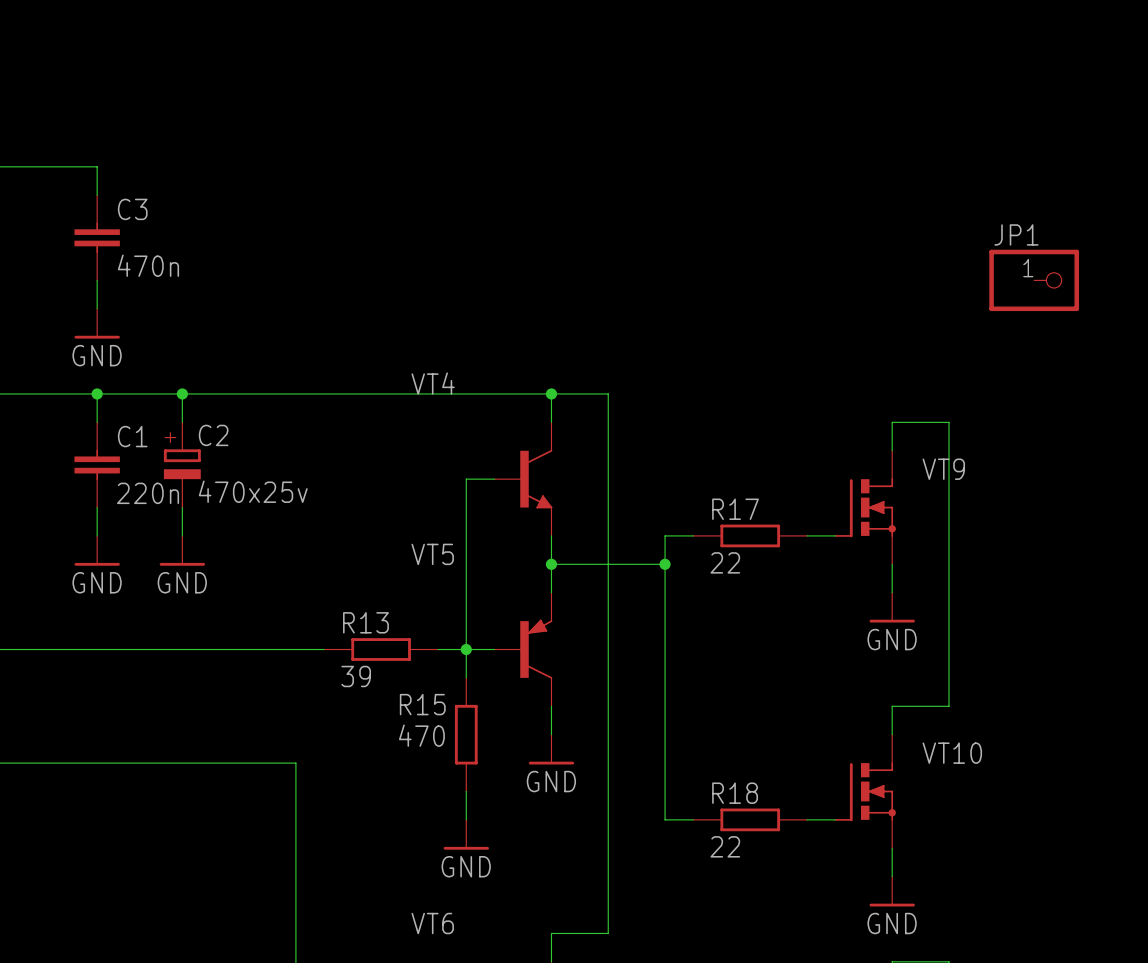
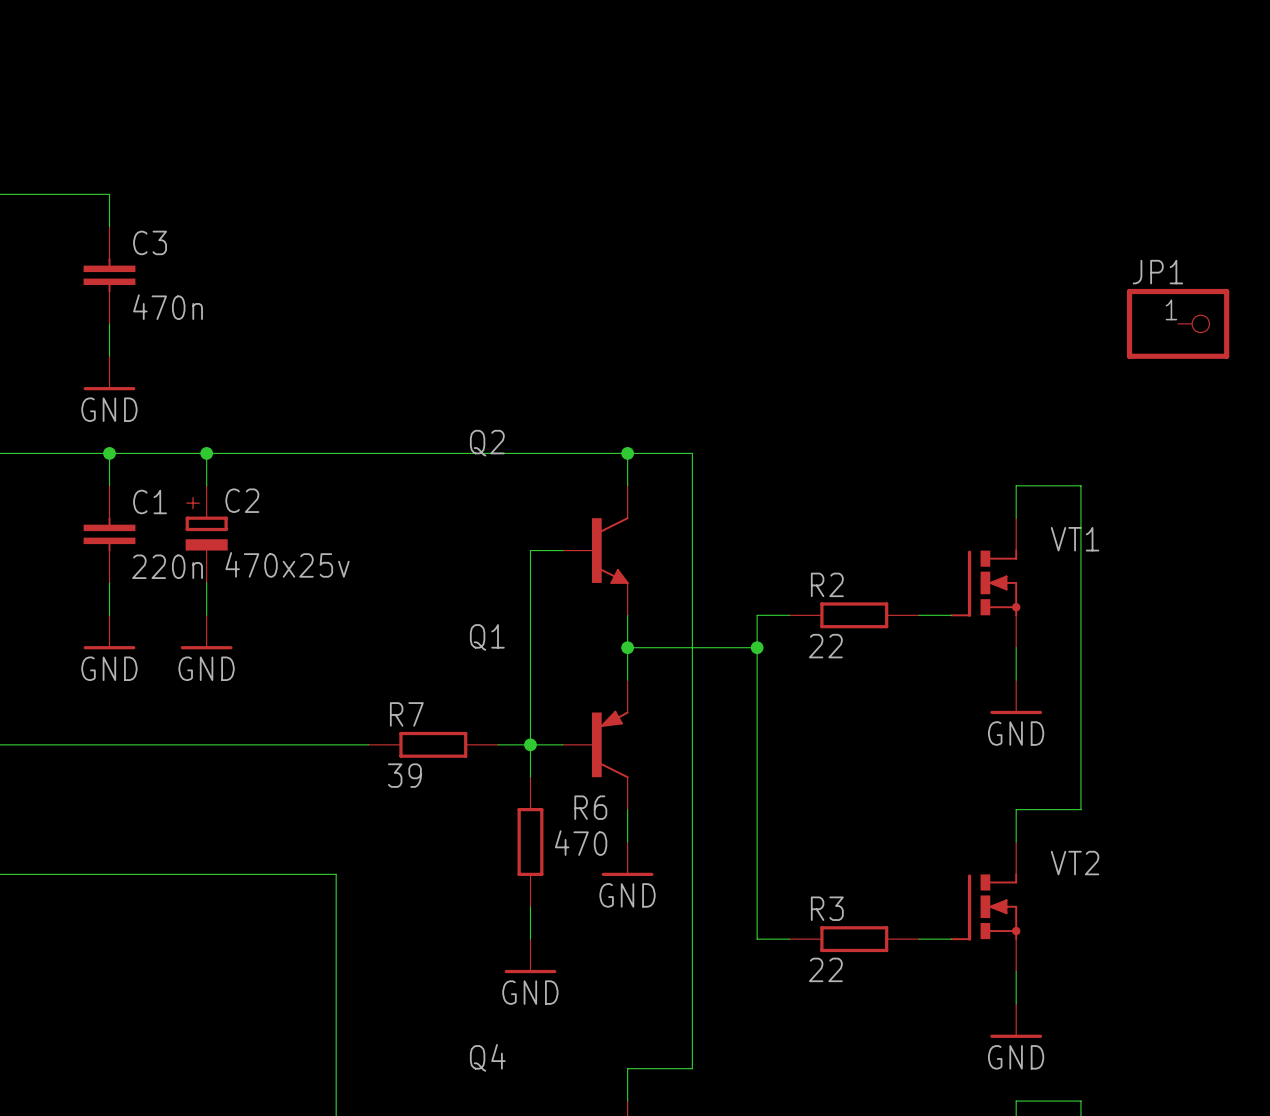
VT4 name: VT4 (433, 383) -> Q2 (487, 443)
VT9 name: VT9 (943, 469) -> VT1 (1075, 539)
R17 name: R17 (735, 509) -> R2 (827, 584)
VT5 name: VT5 (432, 554) -> Q1 (487, 637)
R13 name: R13 (365, 622) -> R7 (406, 714)
R15 name: R15 (422, 704) -> R6 (590, 807)
R15 value position: 470 (421, 735) -> 470 (581, 843)
VT10 name: VT10 (952, 753) -> VT2 (1075, 863)
R18 name: R18 (735, 793) -> R3 (827, 908)
VT6 name: VT6 (432, 923) -> Q4 (487, 1057)

